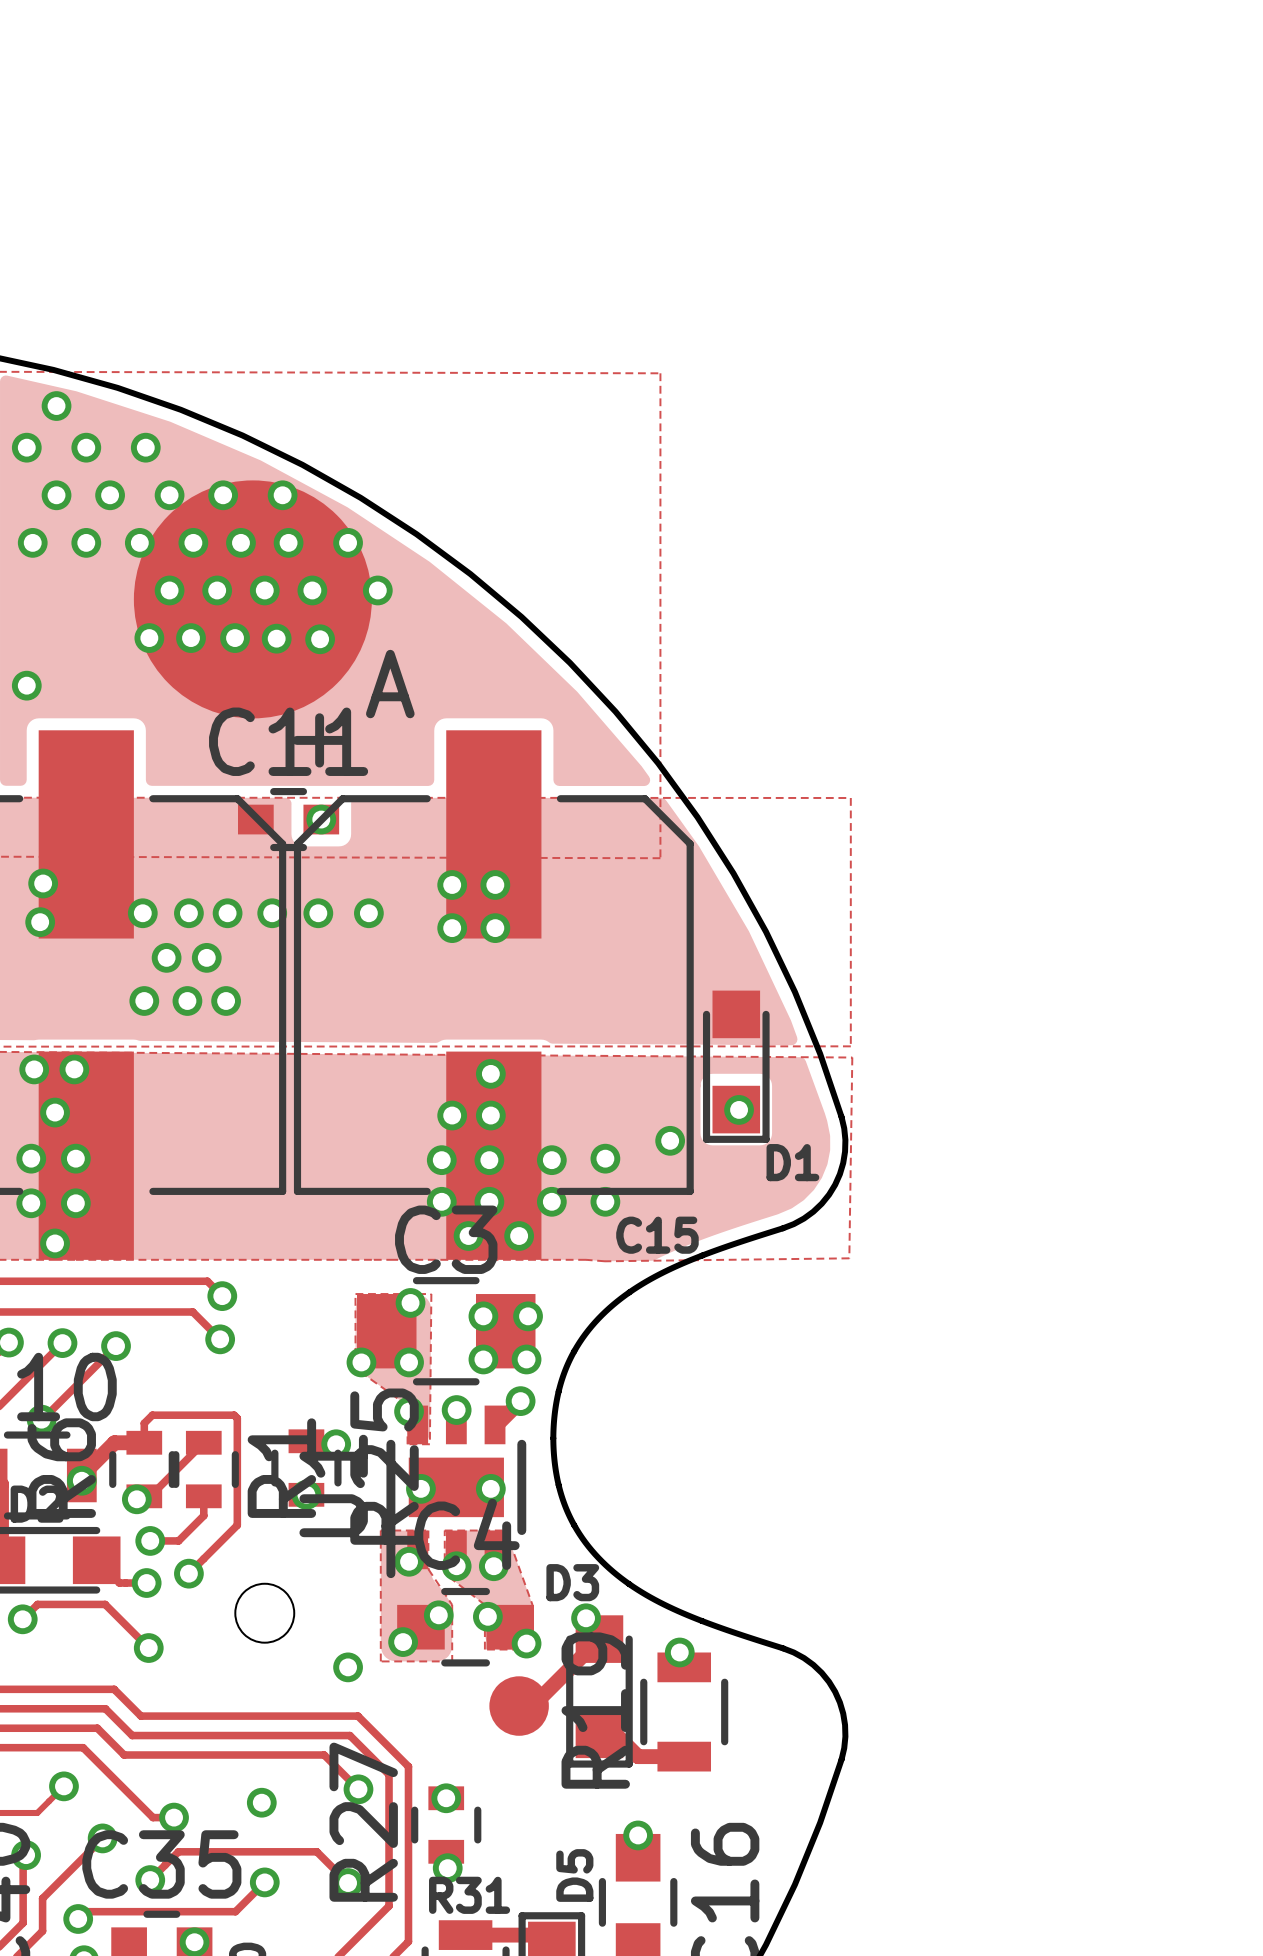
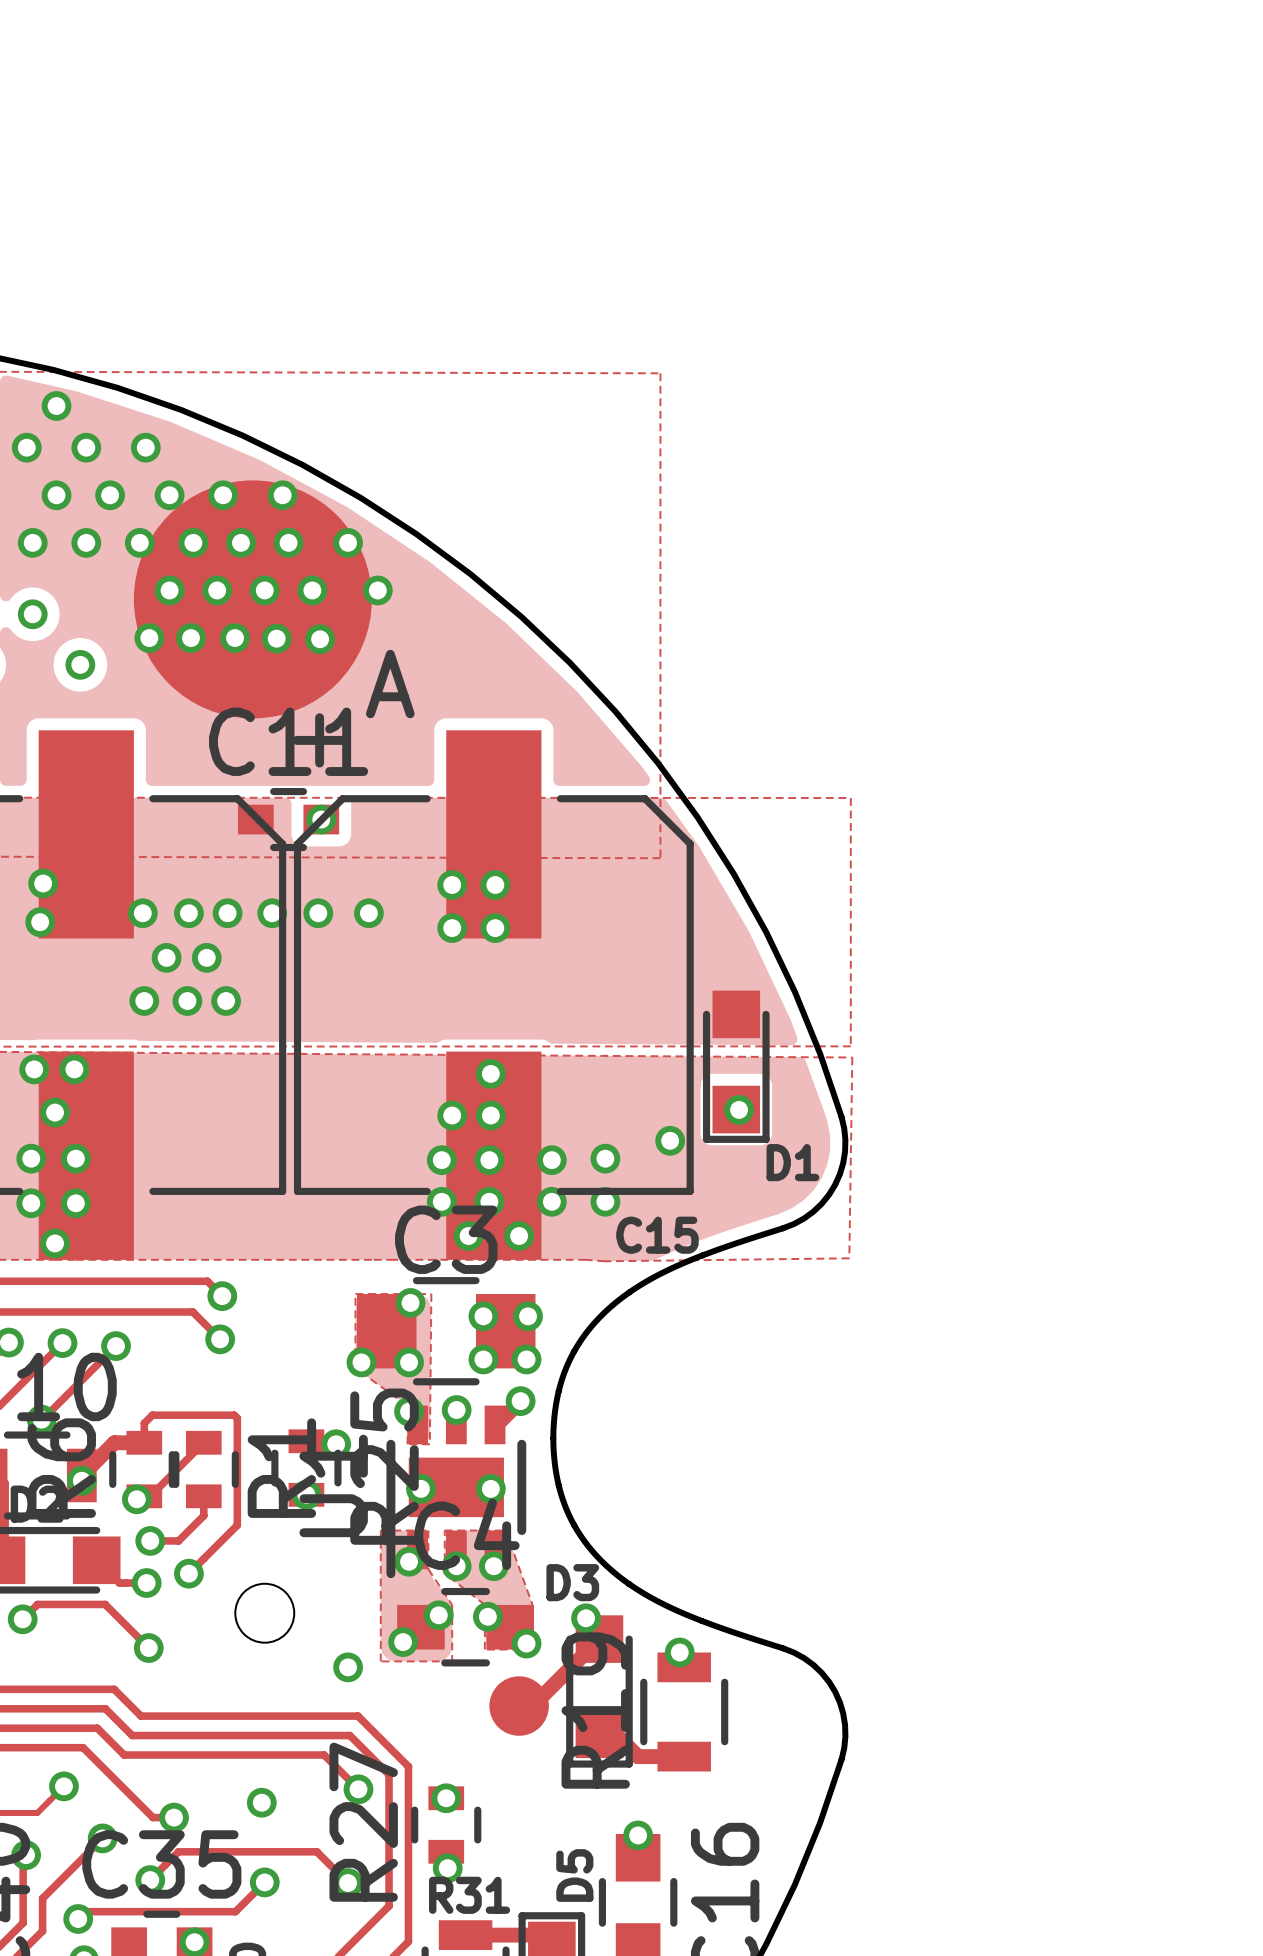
via: none -> (32, 614)
via: none -> (80, 664)
via: (26, 685) -> none

